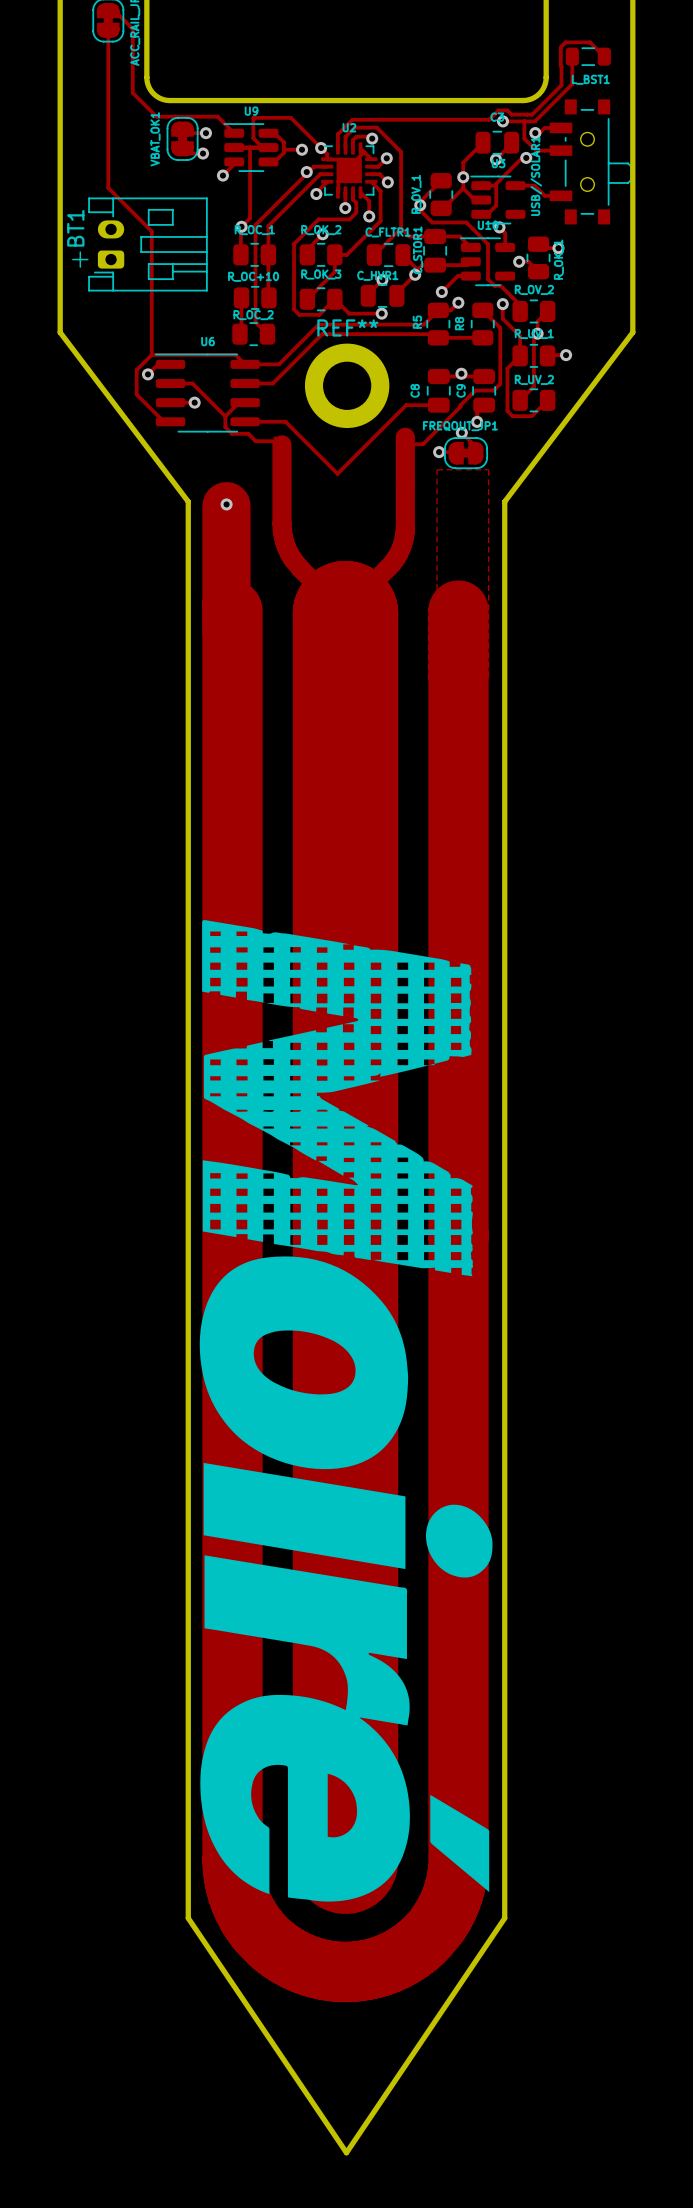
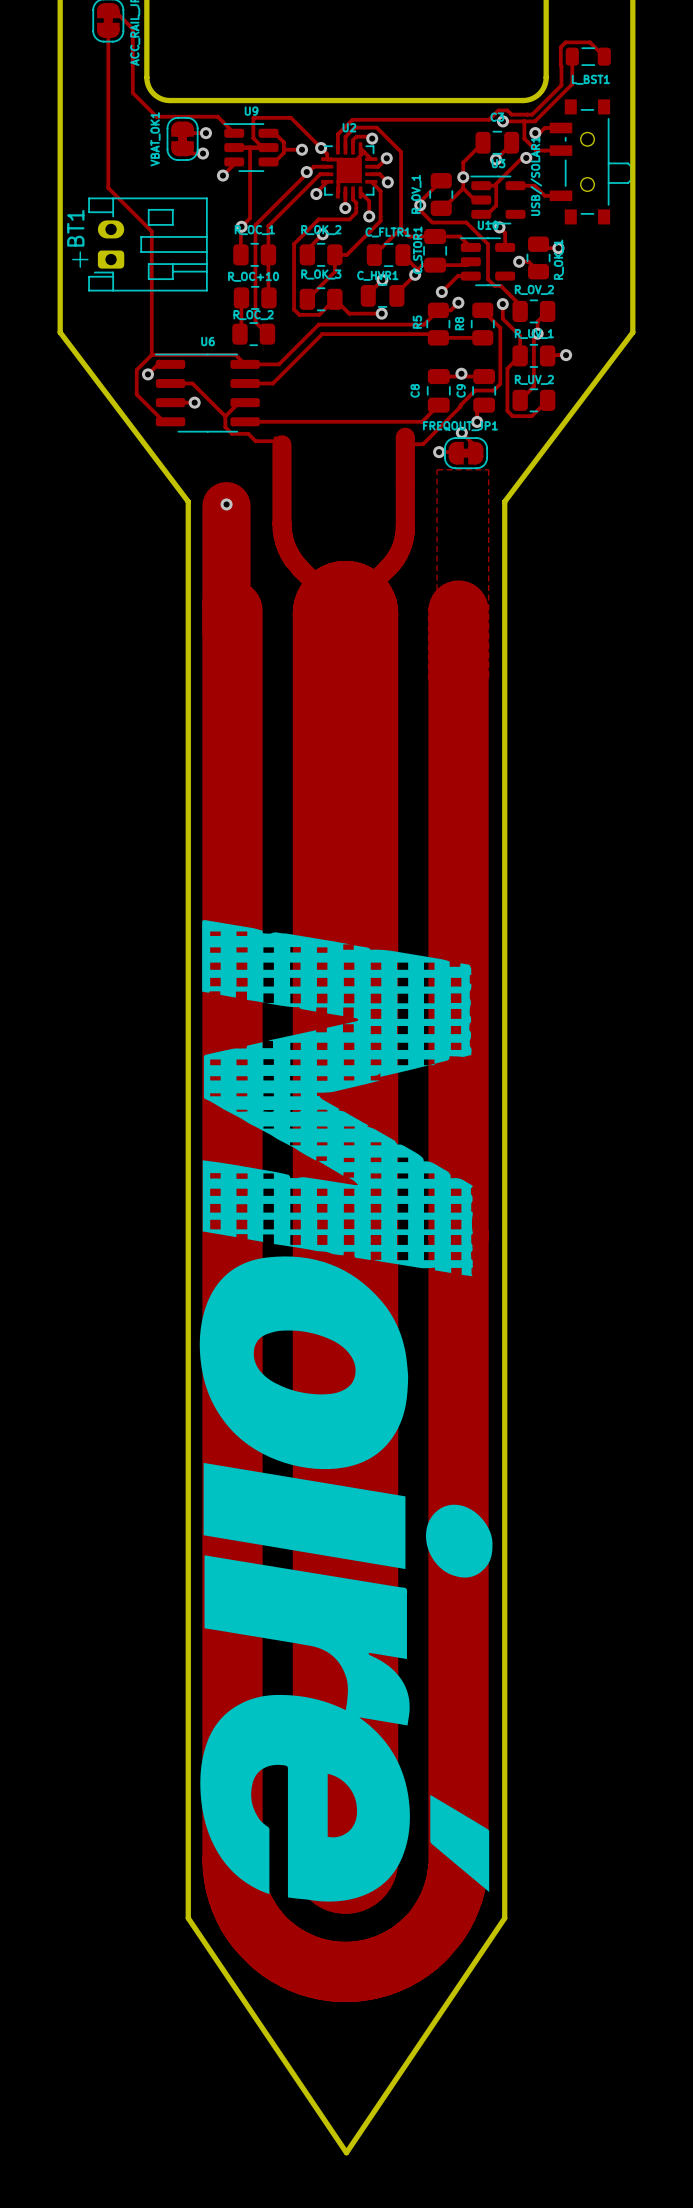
REF**: (347, 385) -> none
track: (438, 405) (406, 405) (337, 473) (285, 421) -> (438, 405) (422, 421) (285, 421)

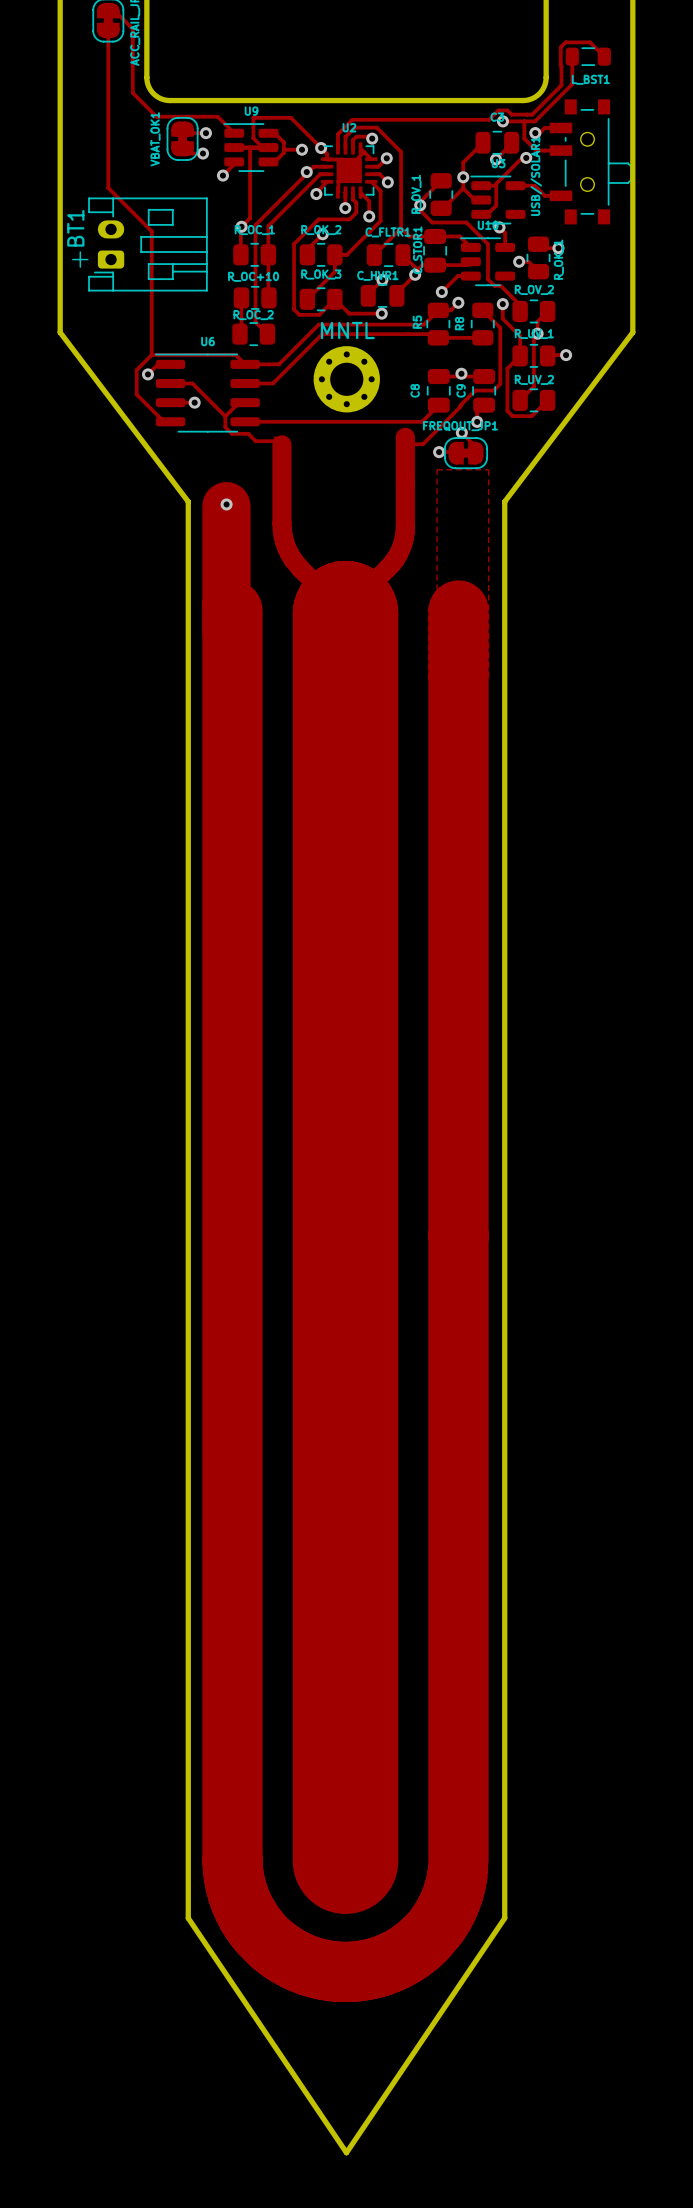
MNTL: none -> (346, 379)
drawing: [199, 920, 493, 1902] -> none
drawing: [430, 1795, 490, 1892] -> none

